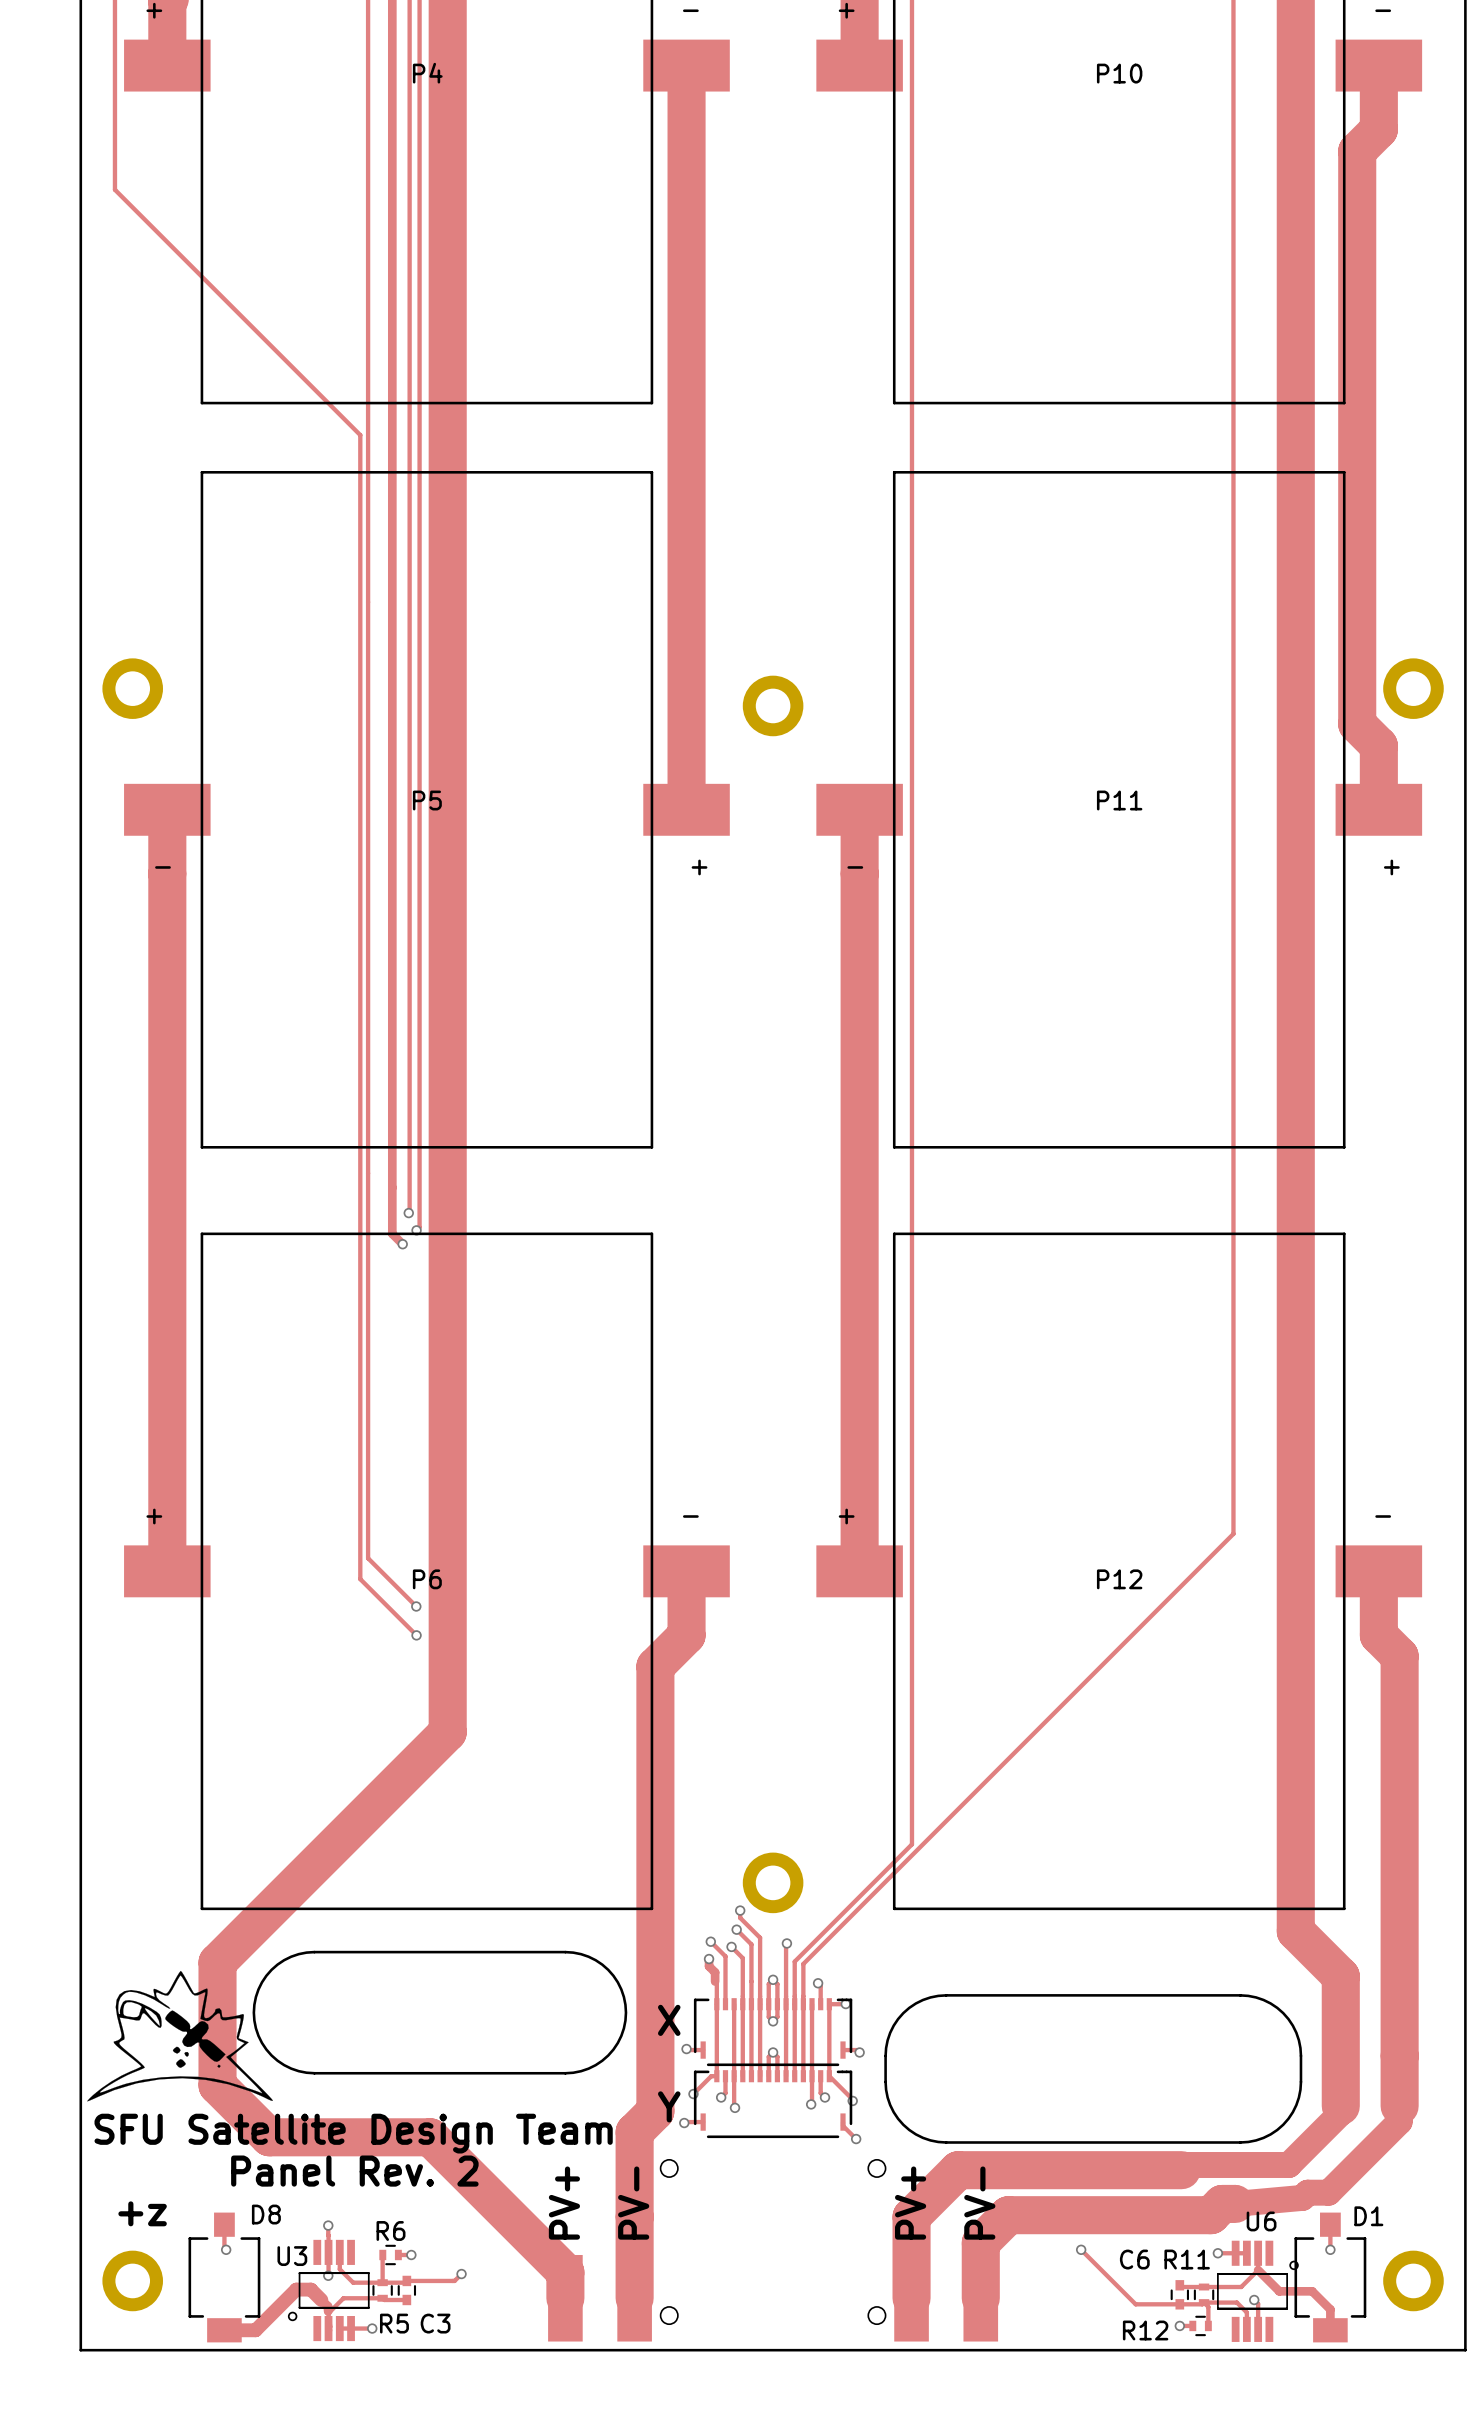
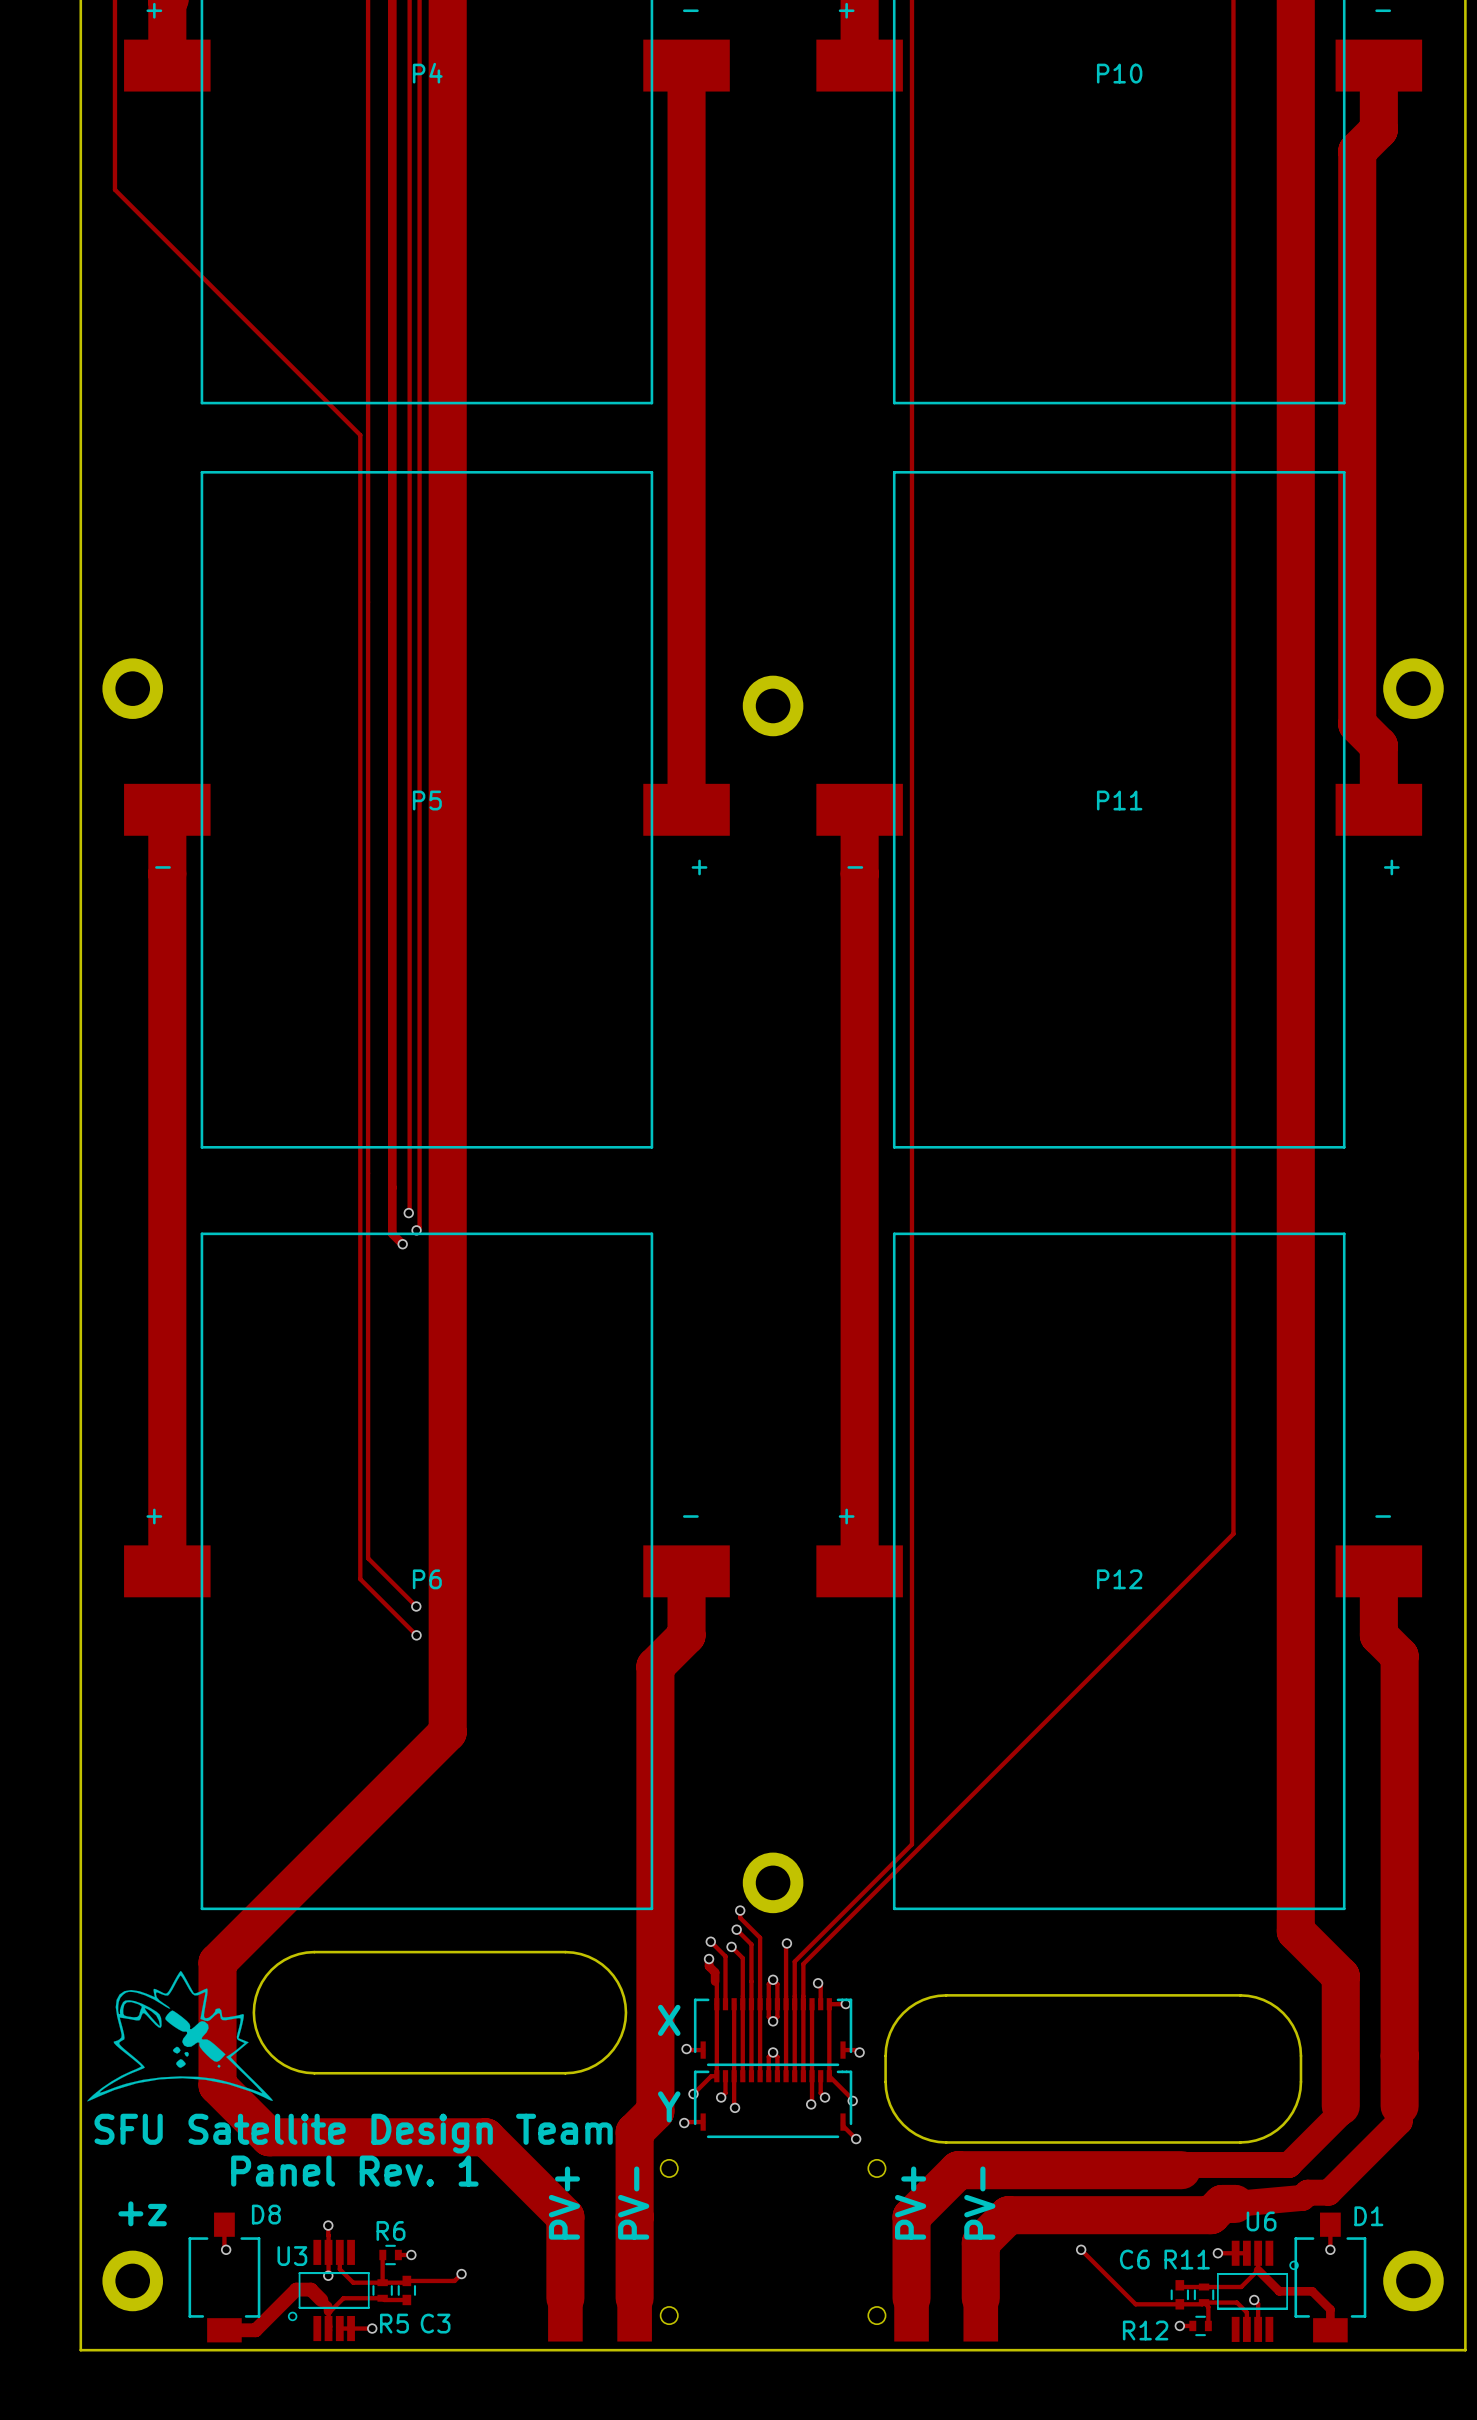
track: (430, 2137) (565, 2272) -> (430, 2137) (485, 2137) (565, 2216) (565, 2272)
text: Panel Rev. 2 (354, 2171) -> Panel Rev. 1 (354, 2171)

